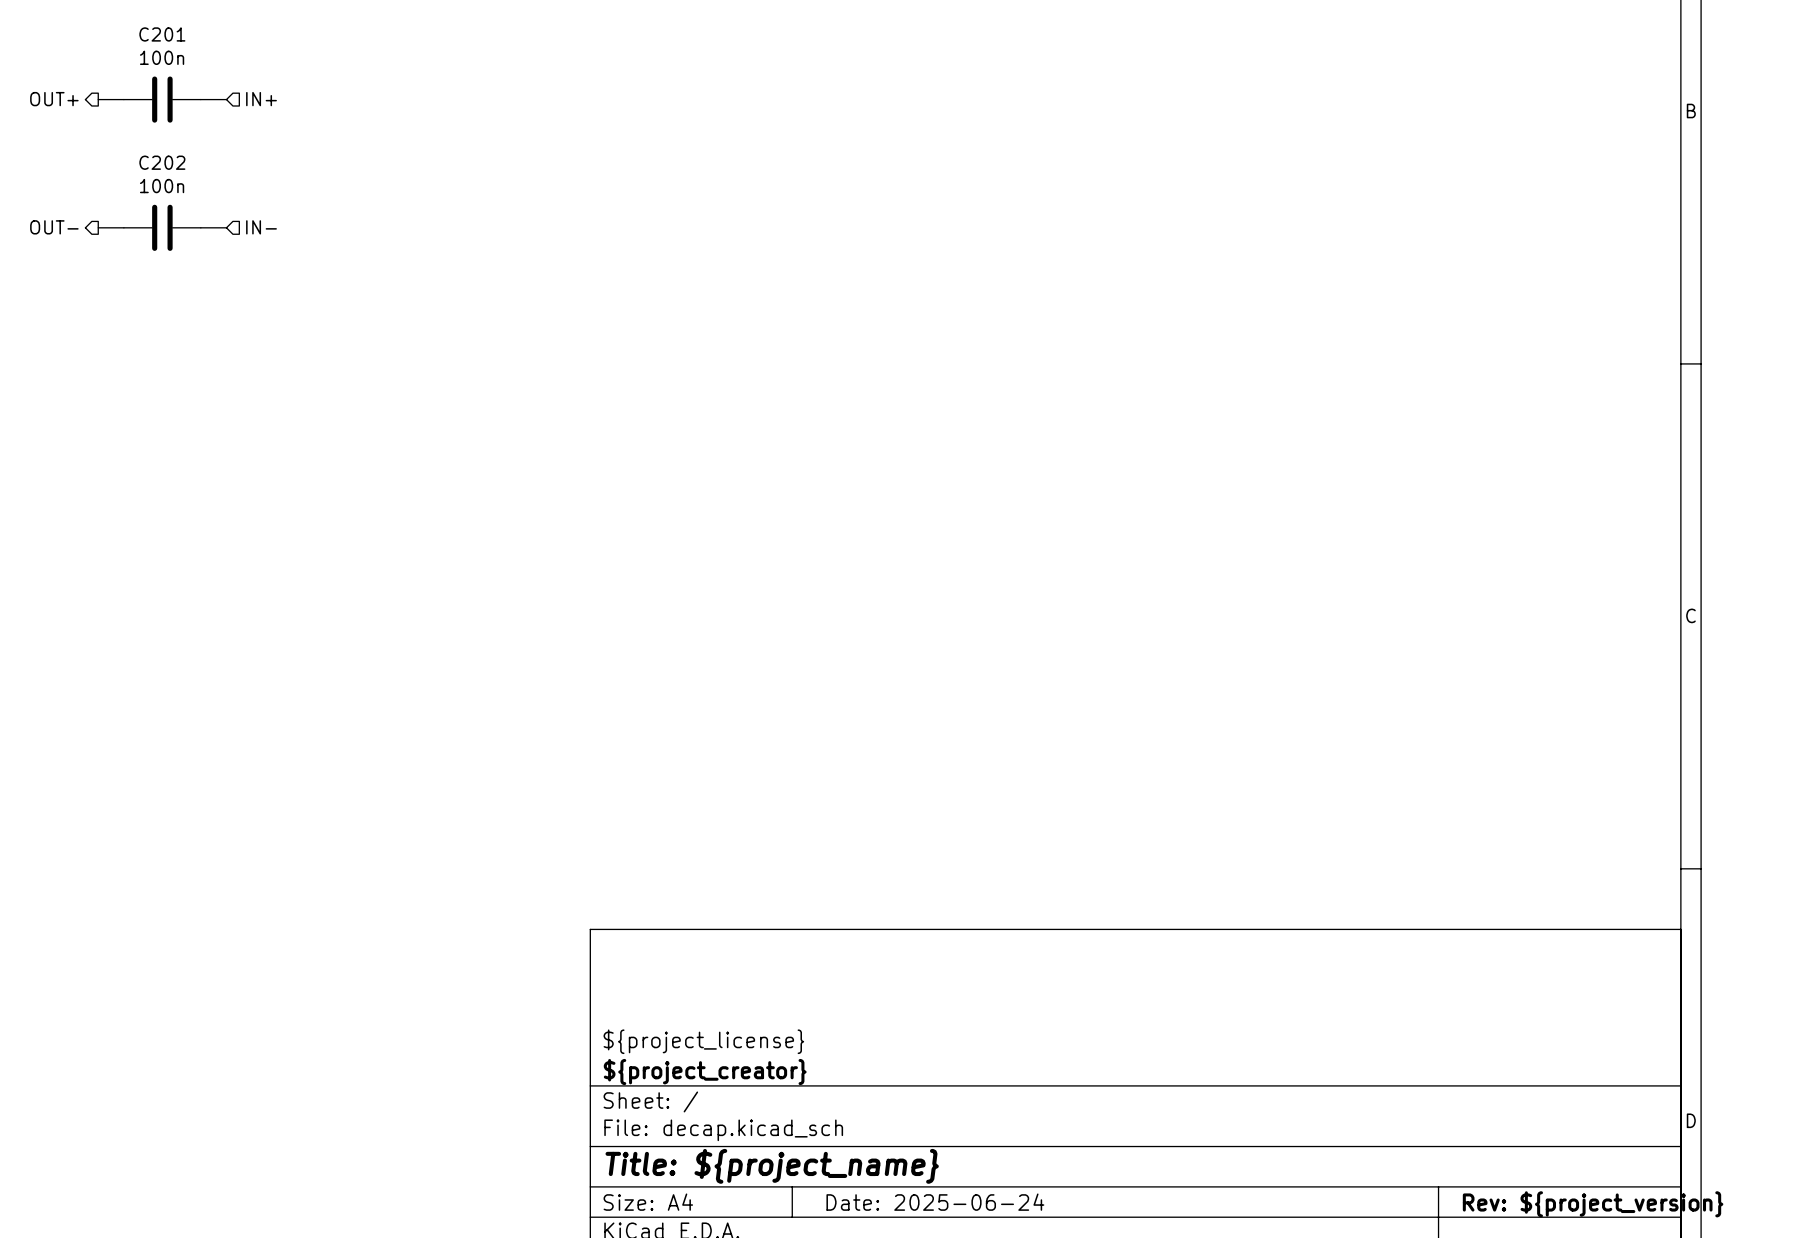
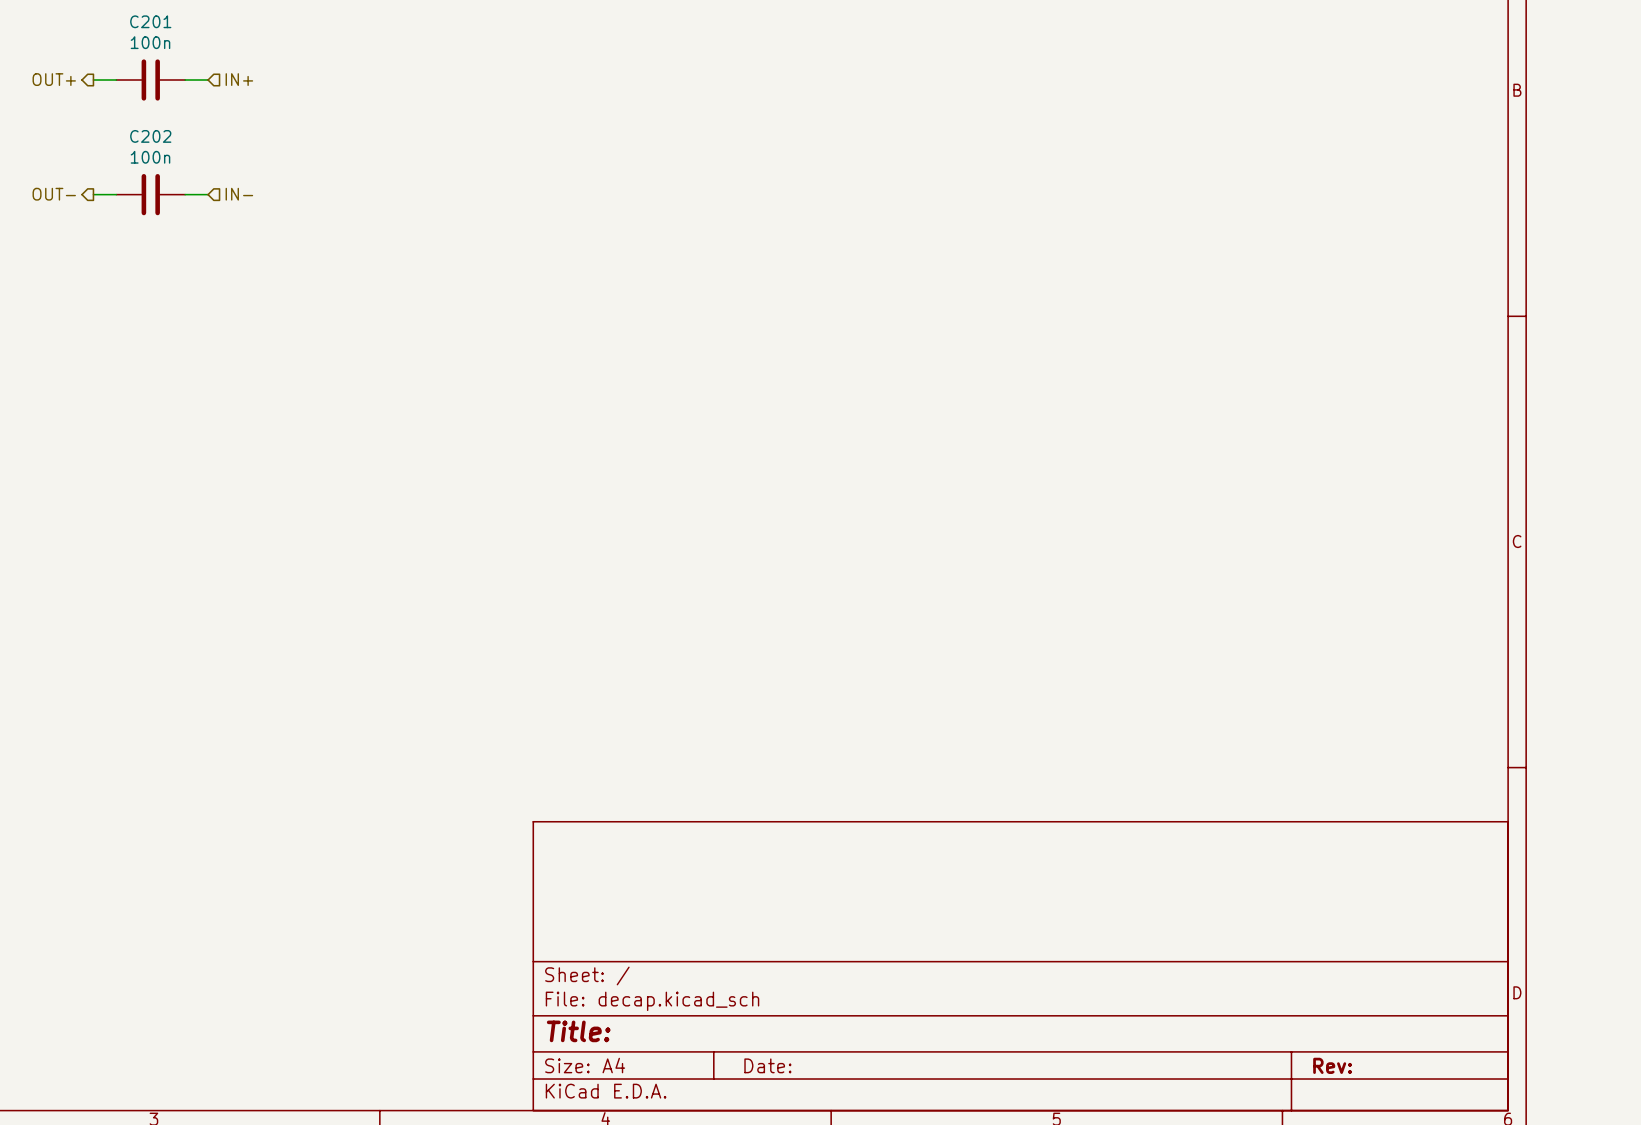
title block: ${project_license} (703, 1041) -> none
title block: ${project_creator} (705, 1072) -> none
title block: Title: ${project_name} (772, 1166) -> Title: (578, 1031)
title block: Date: 2025-06-24 (935, 1202) -> Date: (767, 1065)
title block: Rev: ${project_version} (1593, 1204) -> Rev: (1332, 1065)

